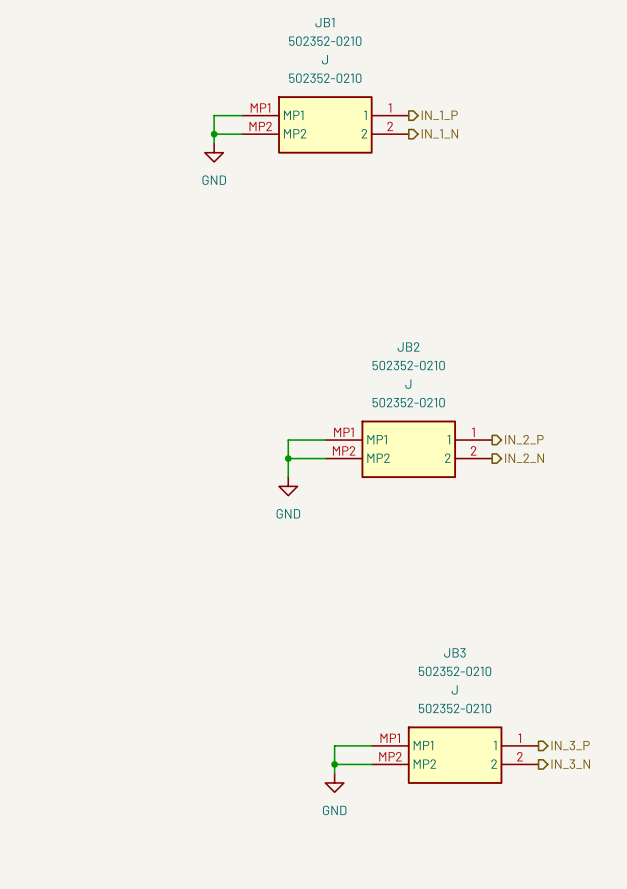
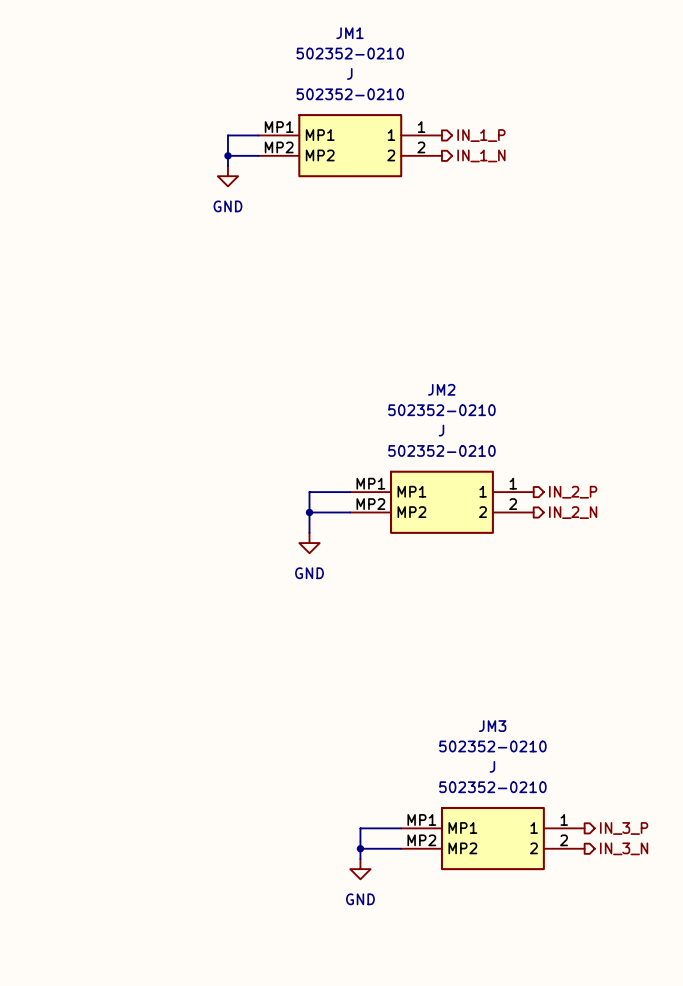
JB1 name: JB1 (324, 22) -> JM1 (350, 33)
JB2 name: JB2 (408, 347) -> JM2 (441, 389)
JB3 name: JB3 (454, 652) -> JM3 (492, 726)

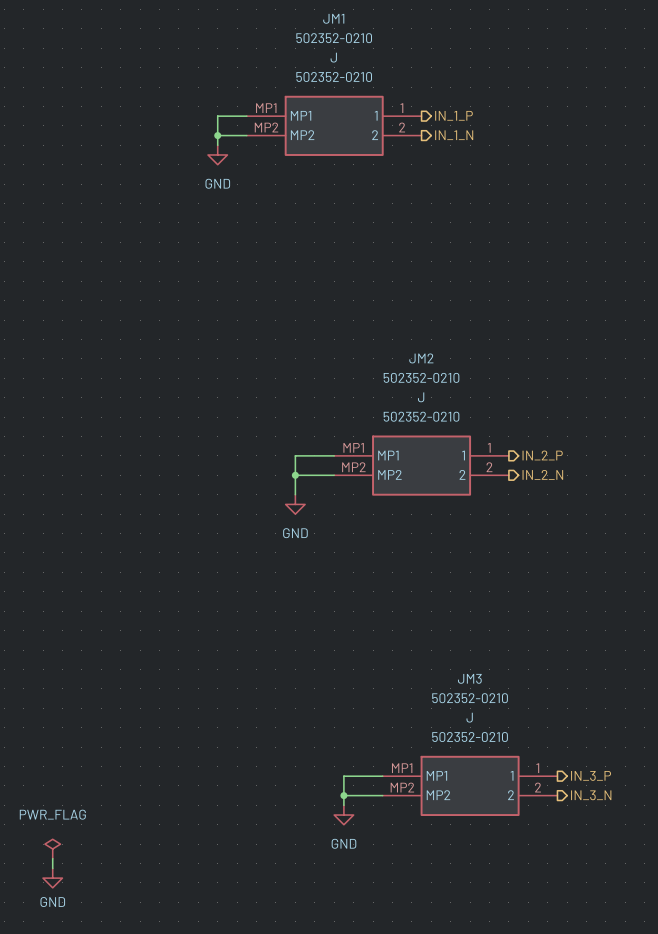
power symbol: none -> PWR_FLAG (52, 849)
wire: none -> (52, 858) (52, 868)
power symbol: none -> GND (52, 878)

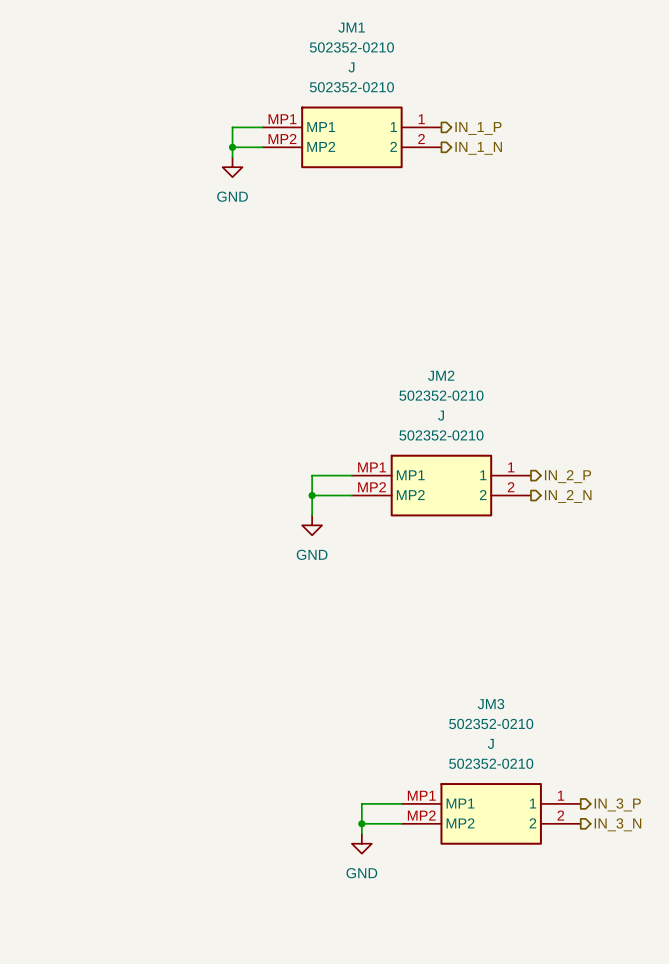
power symbol: PWR_FLAG (52, 849) -> none
wire: (52, 858) (52, 868) -> none
power symbol: GND (52, 878) -> none

